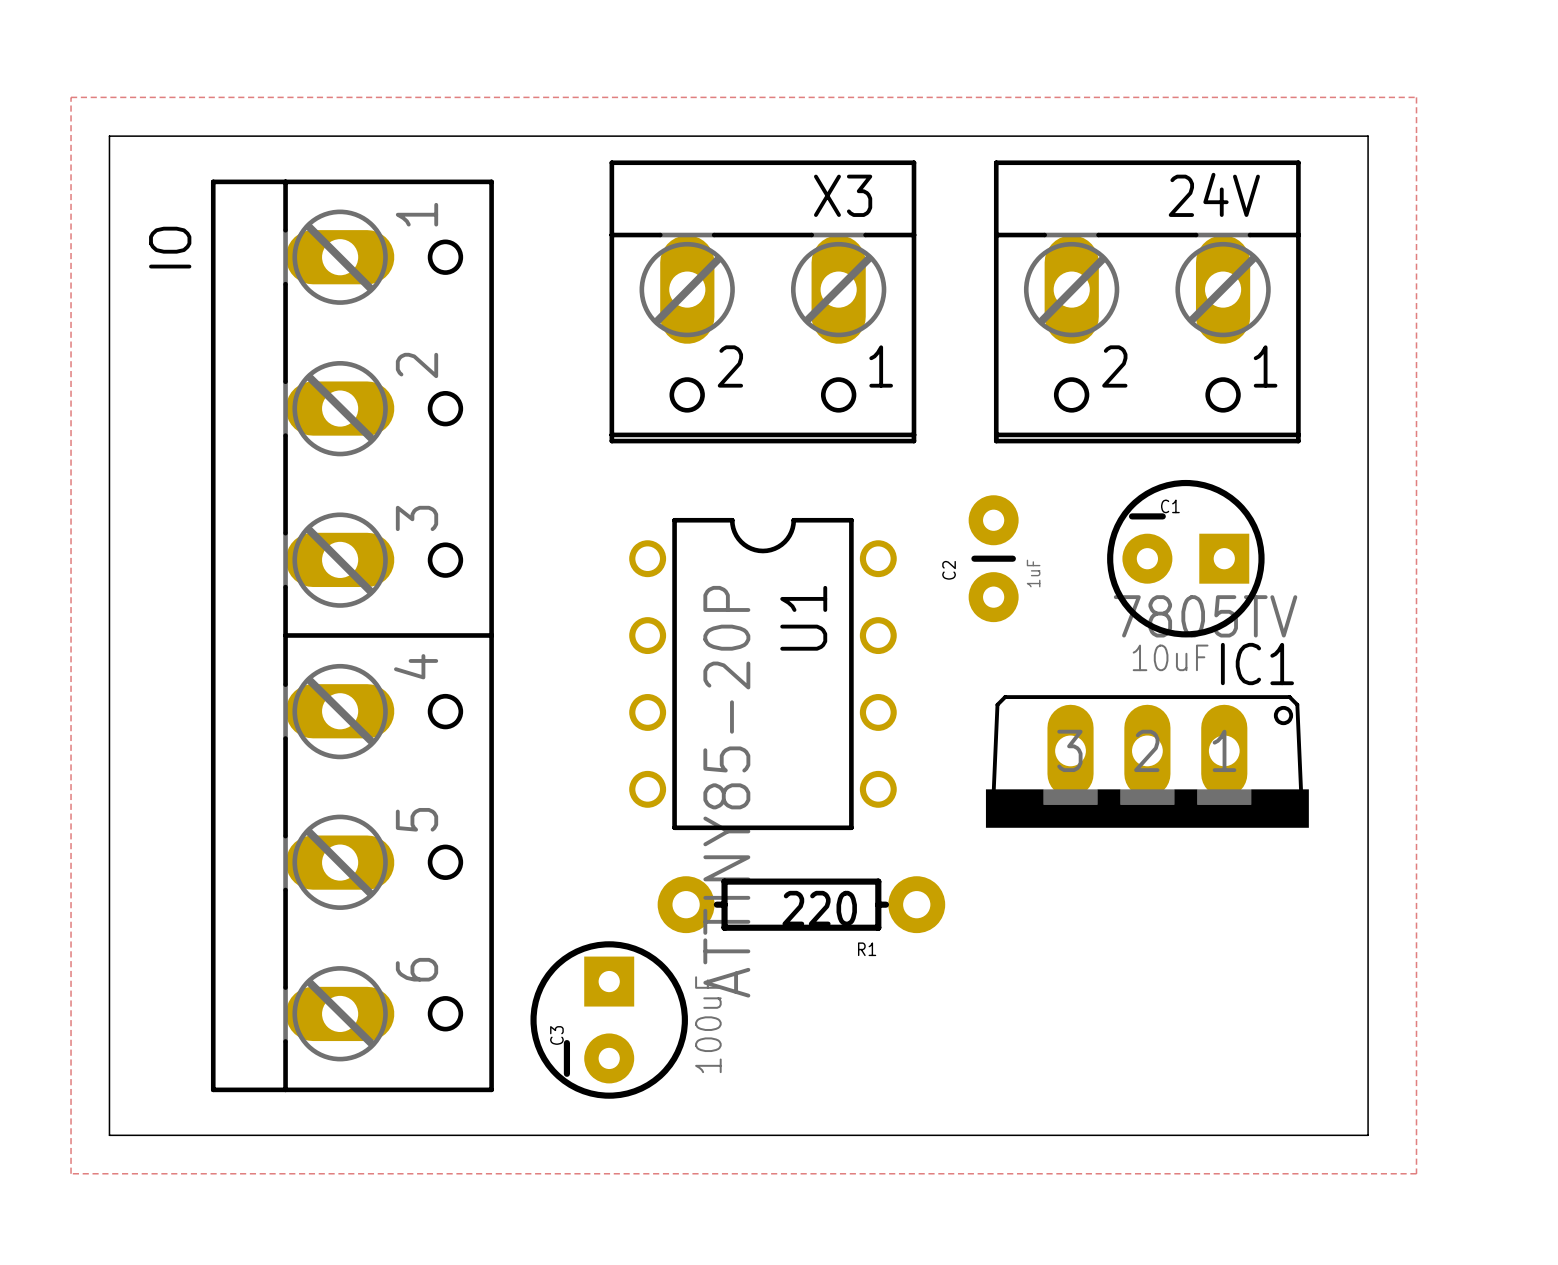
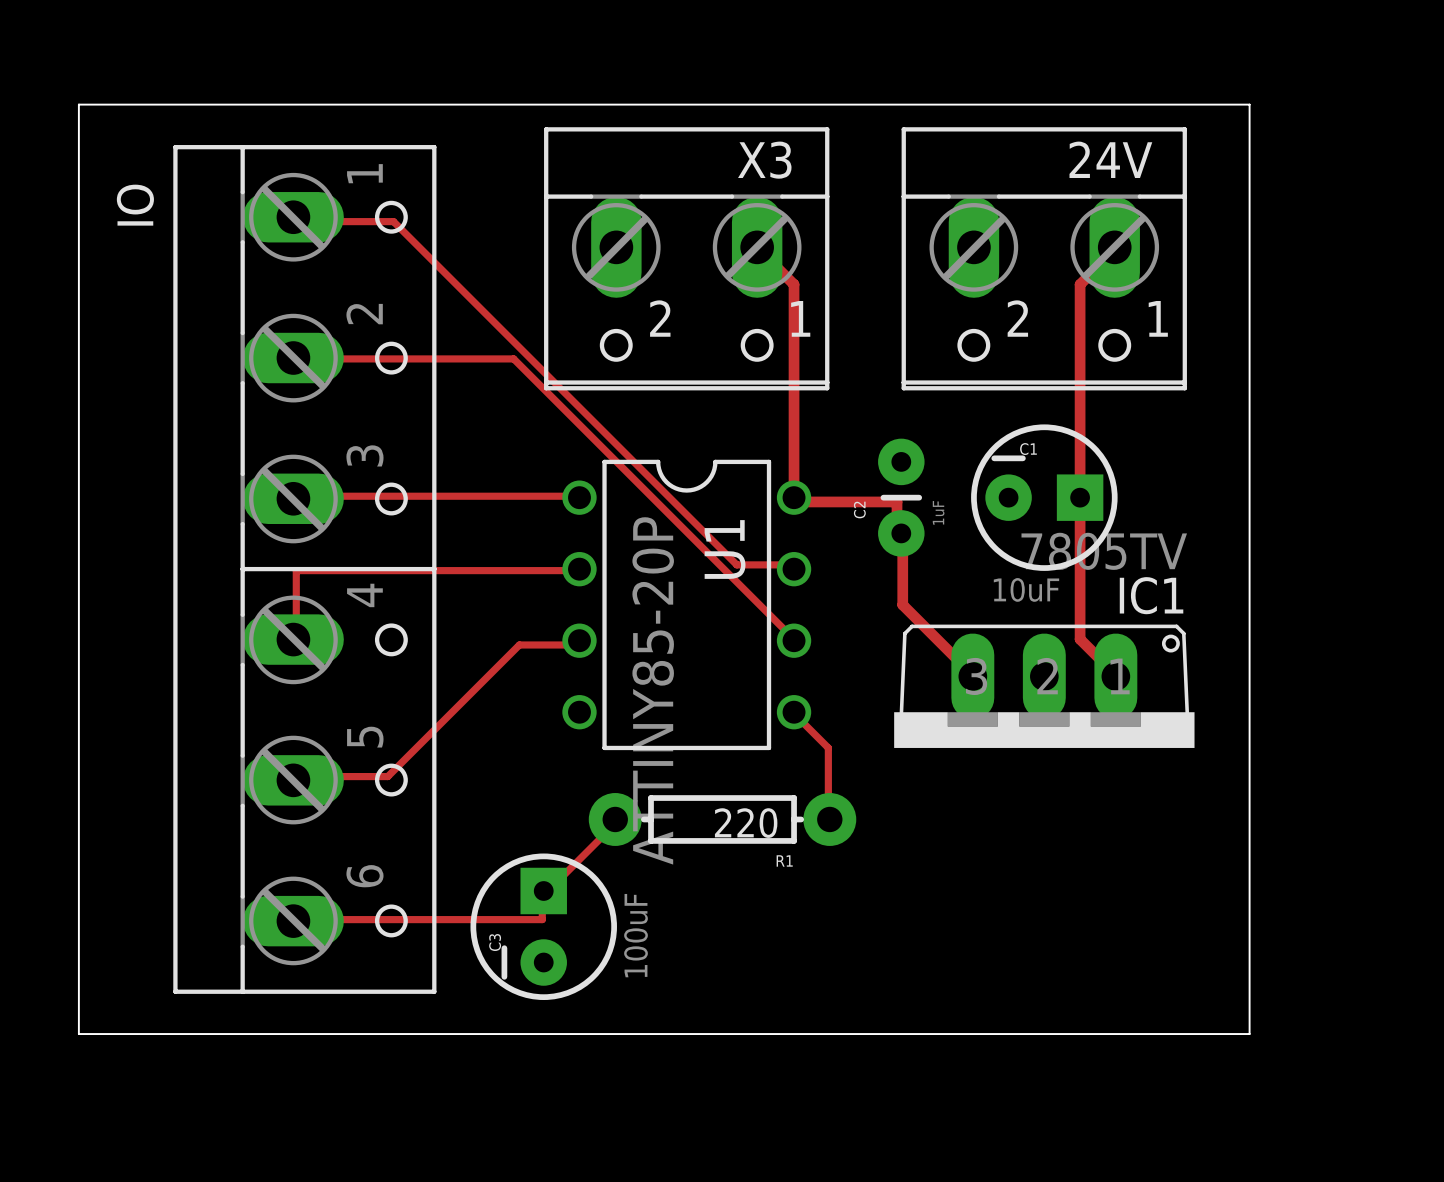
zone outline: (71, 97) (1416, 97) (1416, 1173) (71, 1173) (71, 97) -> none
track: none -> (293, 217) (296, 221) (393, 221) (736, 564) (794, 564) (794, 569)
track: none -> (1114, 247) (1114, 250) (1080, 284) (1080, 639) (1115, 676)
track: none -> (759, 250) (794, 284) (794, 501) (897, 501) (897, 530) (902, 536) (902, 604) (972, 676)
track: none -> (293, 358) (513, 358) (794, 640)
track: none -> (579, 497) (296, 496) (293, 498)
C1 position: (1185, 558) -> (1044, 497)
track: none -> (579, 569) (296, 570) (296, 639) (293, 639)
track: none -> (579, 640) (576, 644) (519, 644) (387, 776) (296, 776) (293, 780)
track: none -> (794, 712) (828, 747) (829, 819)
track: none -> (615, 819) (610, 822) (610, 828) (548, 890) (542, 890) (542, 919) (296, 919) (293, 921)

